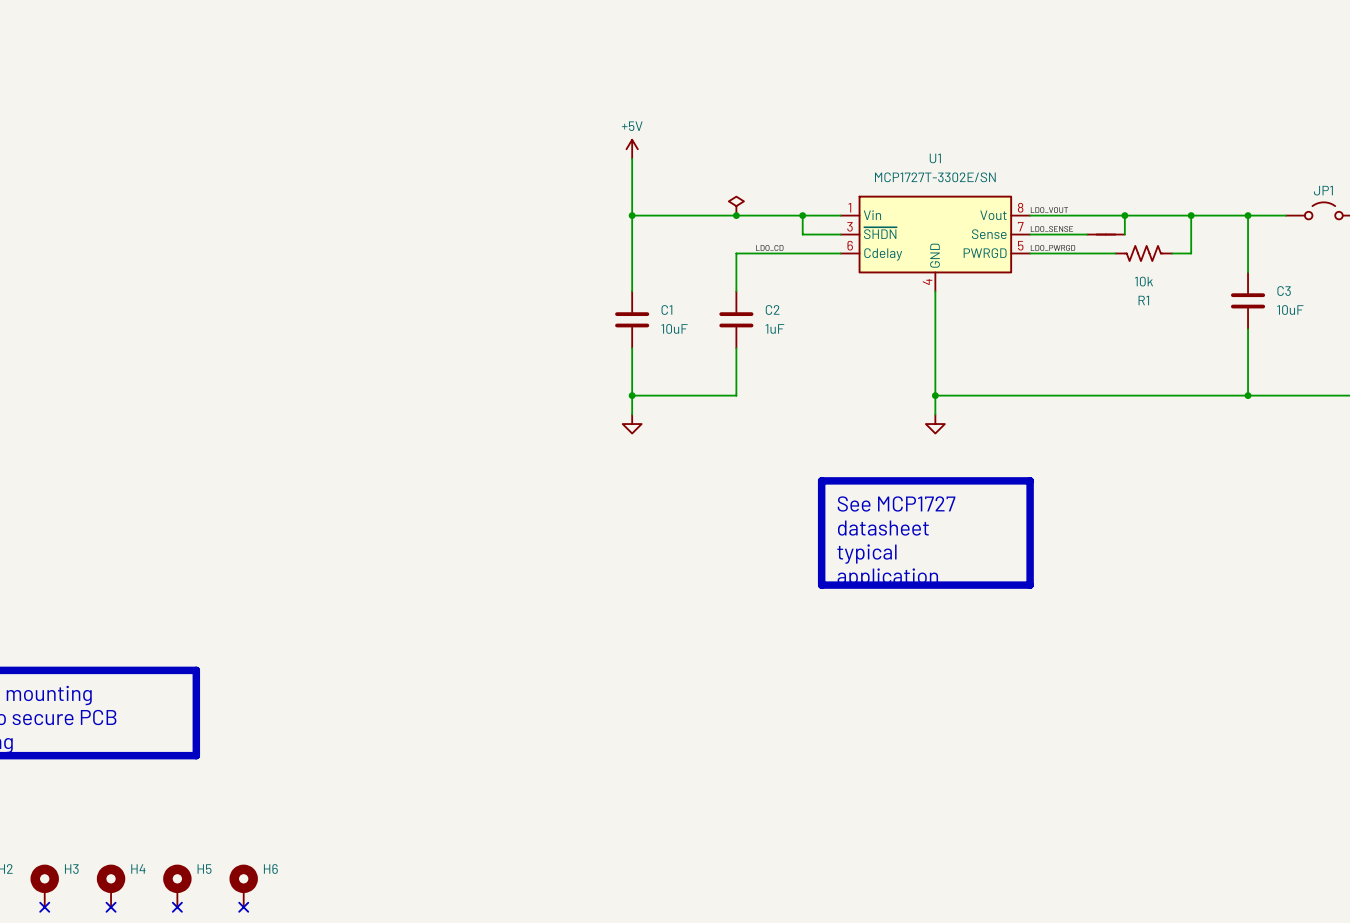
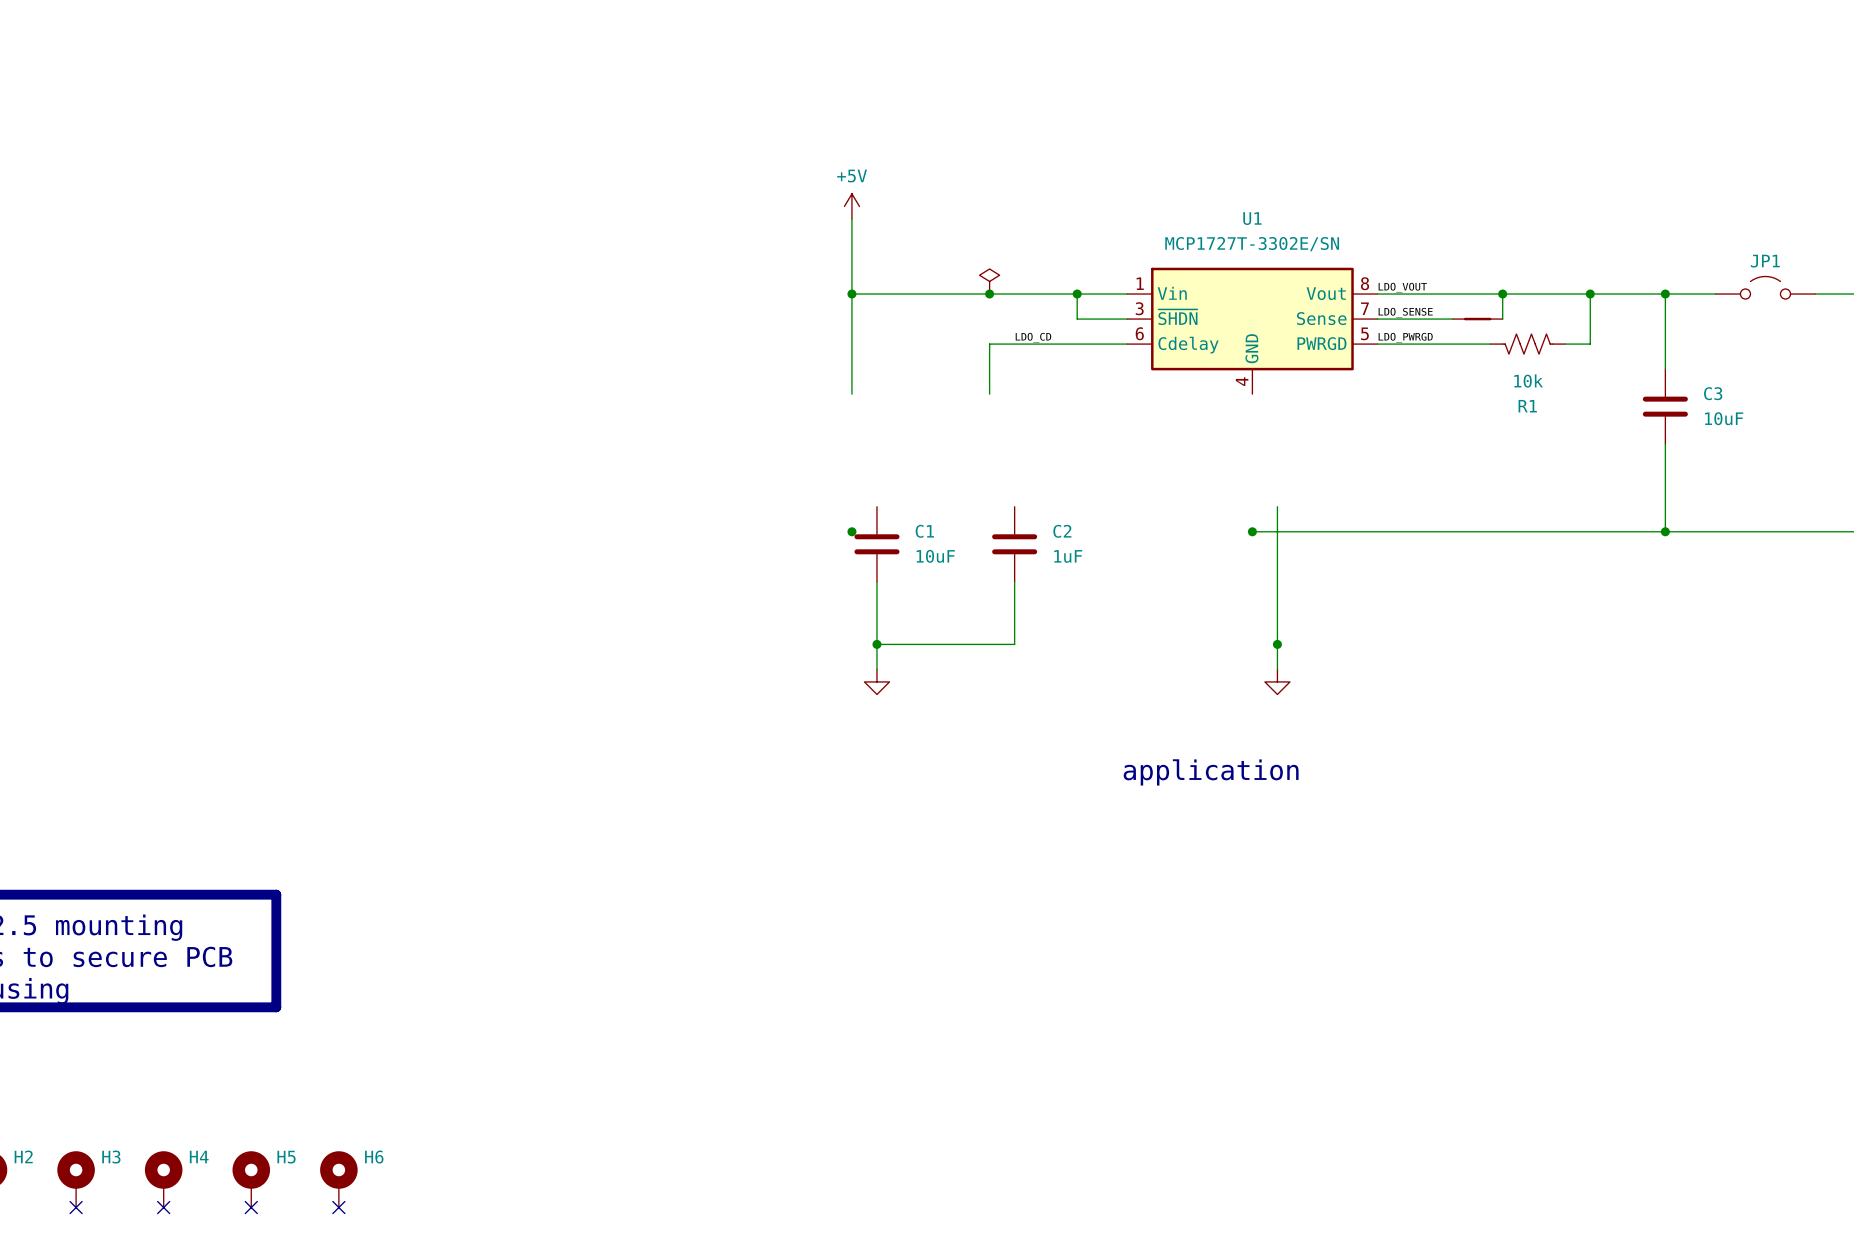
wire: (935, 291) (935, 414) -> (1277, 506) (1277, 669)
C1 position: (632, 319) -> (876, 544)
C2 position: (736, 319) -> (1014, 544)
wire: (632, 348) (632, 414) -> (876, 581) (876, 669)
wire: (736, 348) (736, 395) (632, 395) -> (1014, 581) (1014, 644) (876, 644)
power symbol position: (632, 424) -> (876, 681)
power symbol position: (935, 424) -> (1277, 681)
junction: none -> (876, 644)
line: (821, 480) (1030, 480) (1030, 585) (821, 585) (821, 480) -> none
junction: none -> (1277, 644)
text: See MCP1727 (896, 503) -> none
text: datasheet (883, 528) -> none
text: typical (866, 554) -> none

